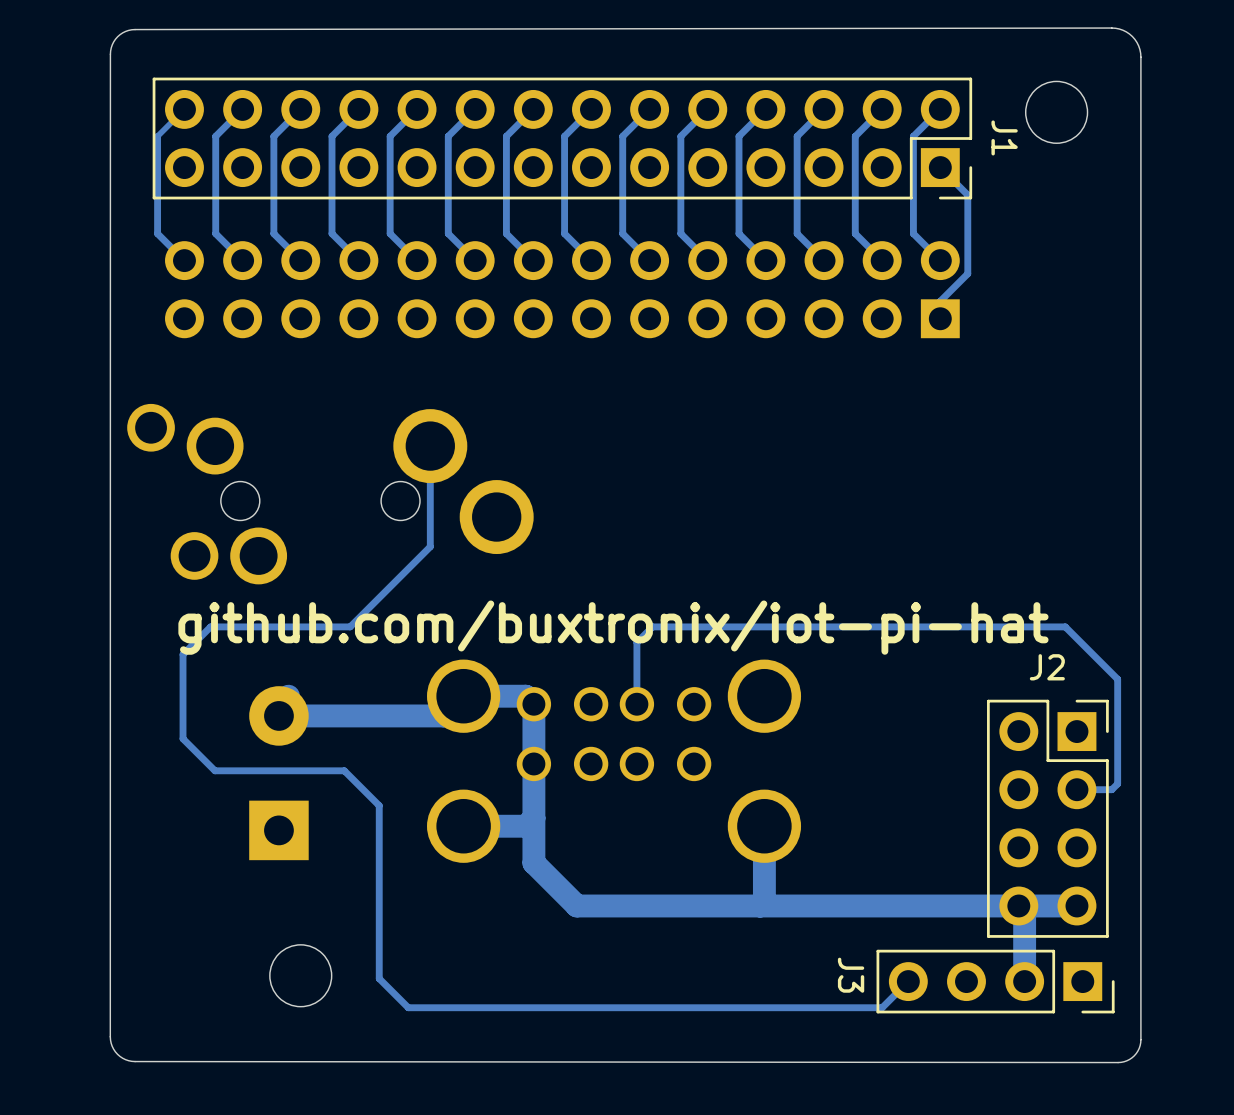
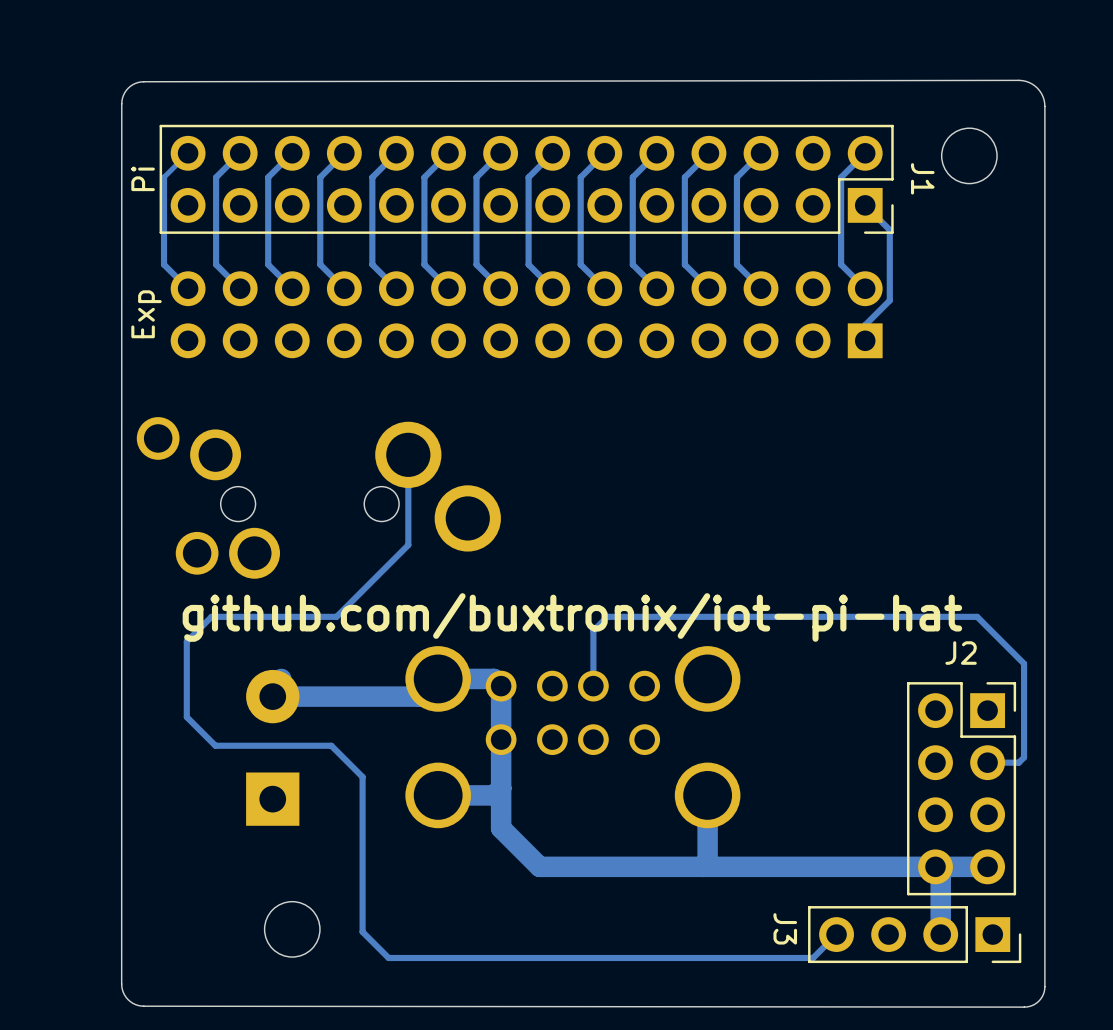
track: (882, 109) (855, 136) (855, 233) (882, 260) -> none
text: none -> Pi (143, 178)
text: none -> Exp (146, 314)

